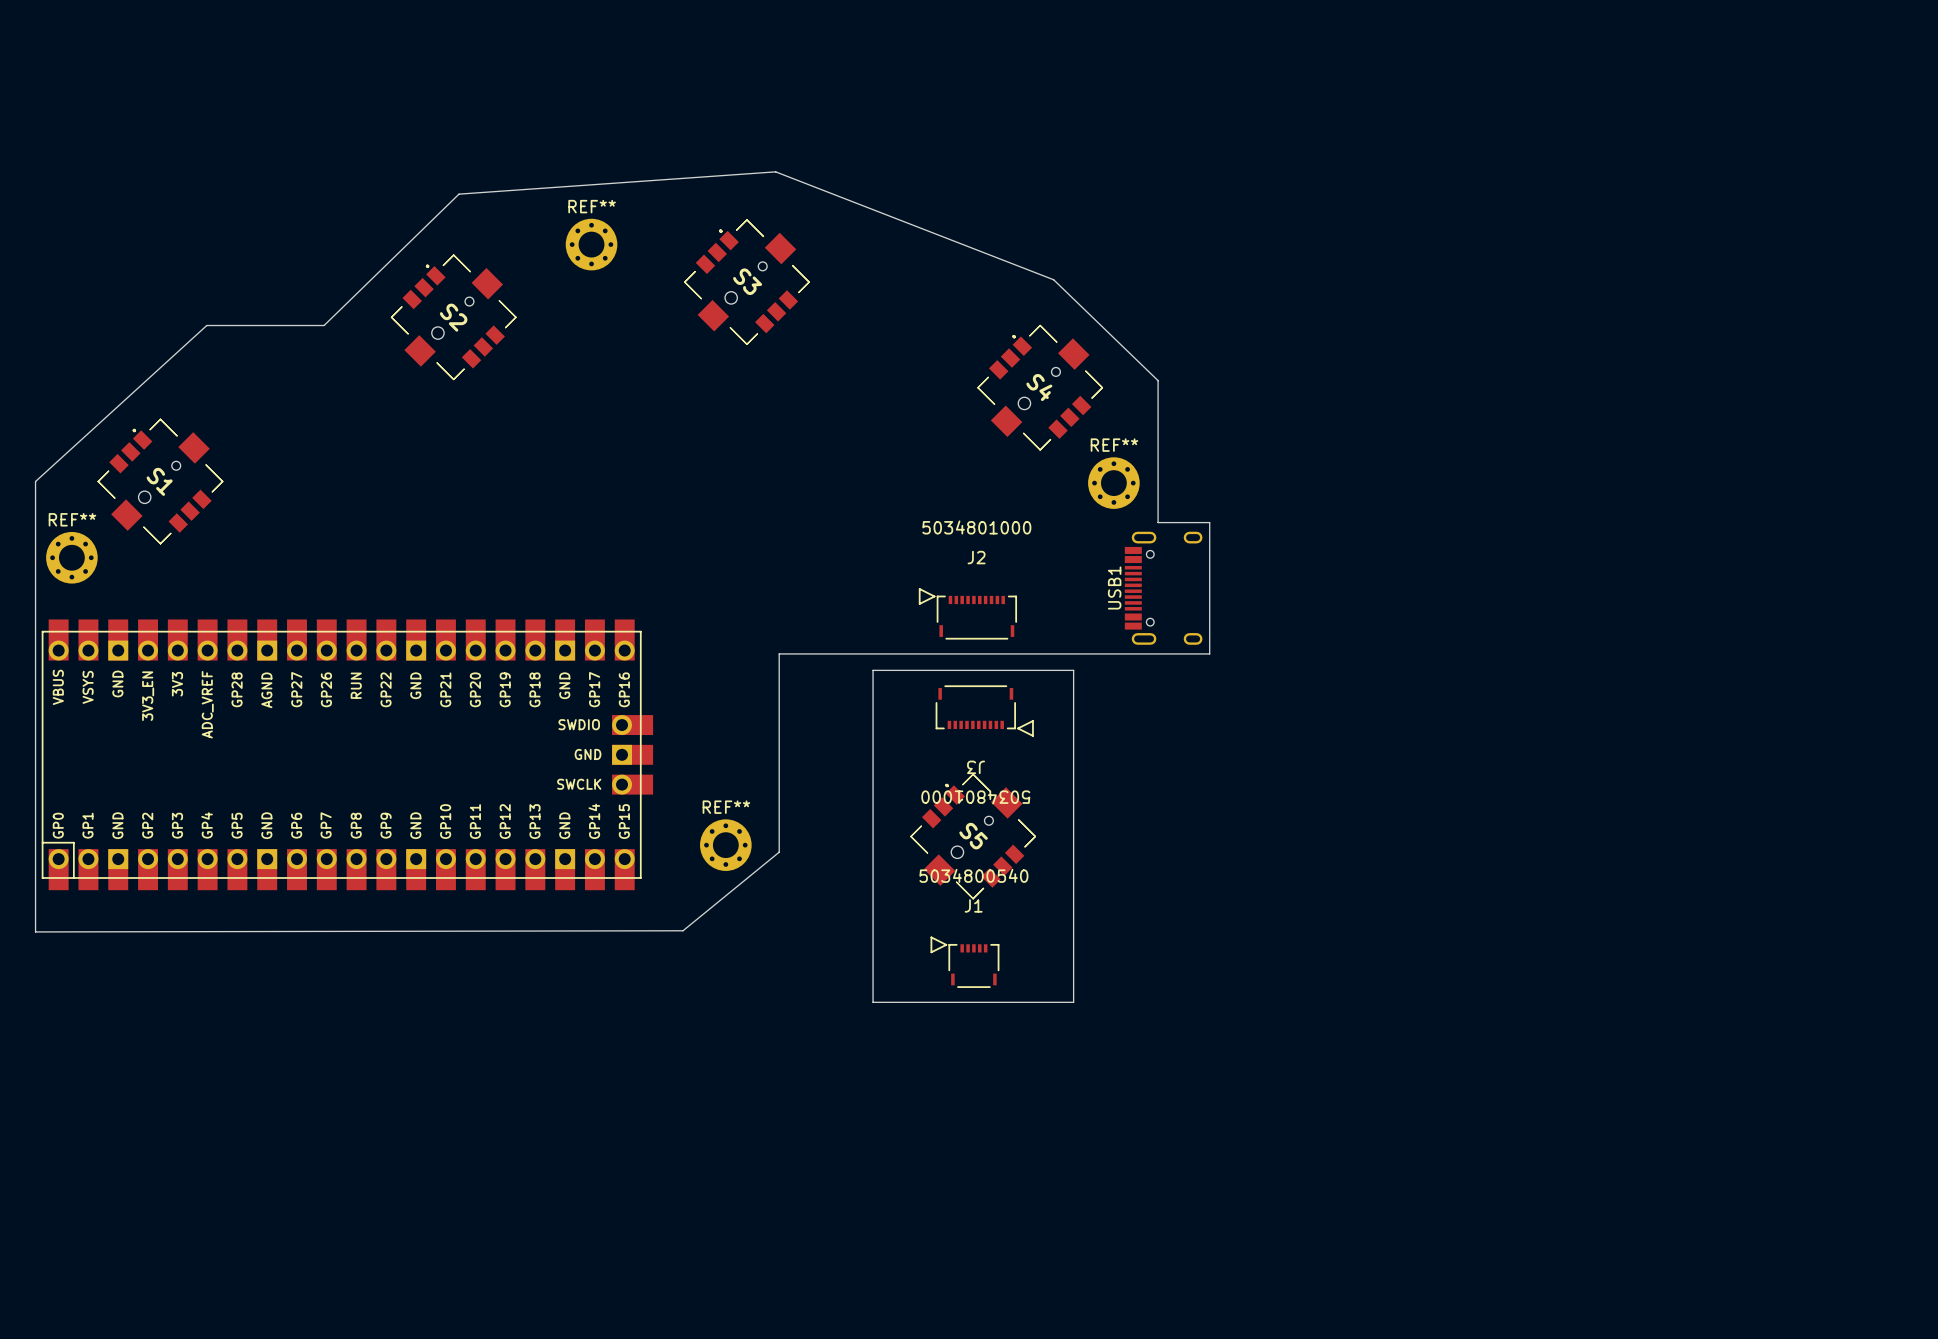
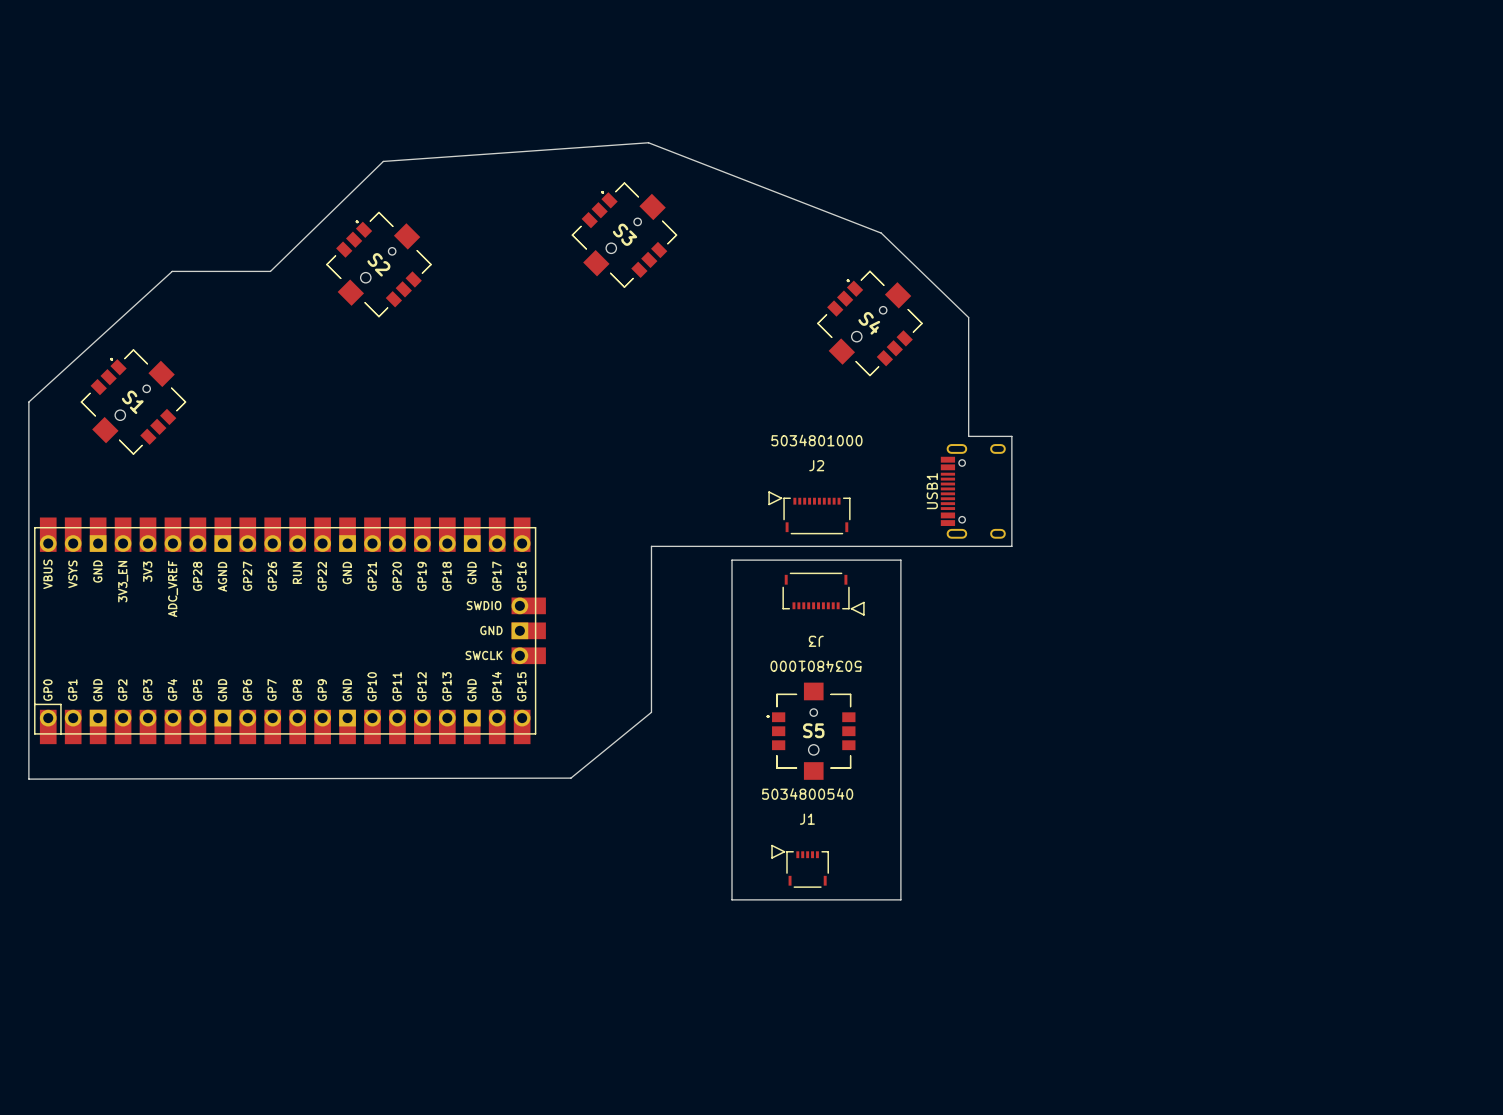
REF**: (591, 244) -> none
REF**: (1113, 483) -> none
REF**: (71, 557) -> none
board edge: (875, 670) (873, 670) (873, 1002) (1073, 1002) (1073, 670) -> (732, 560) (732, 899) (900, 899) (900, 560) (897, 560)
S5 rotation: 0° (973, 836) -> 45° counterclockwise (811, 731)
REF**: (725, 845) -> none
J1 position: (964, 962) -> (800, 866)

